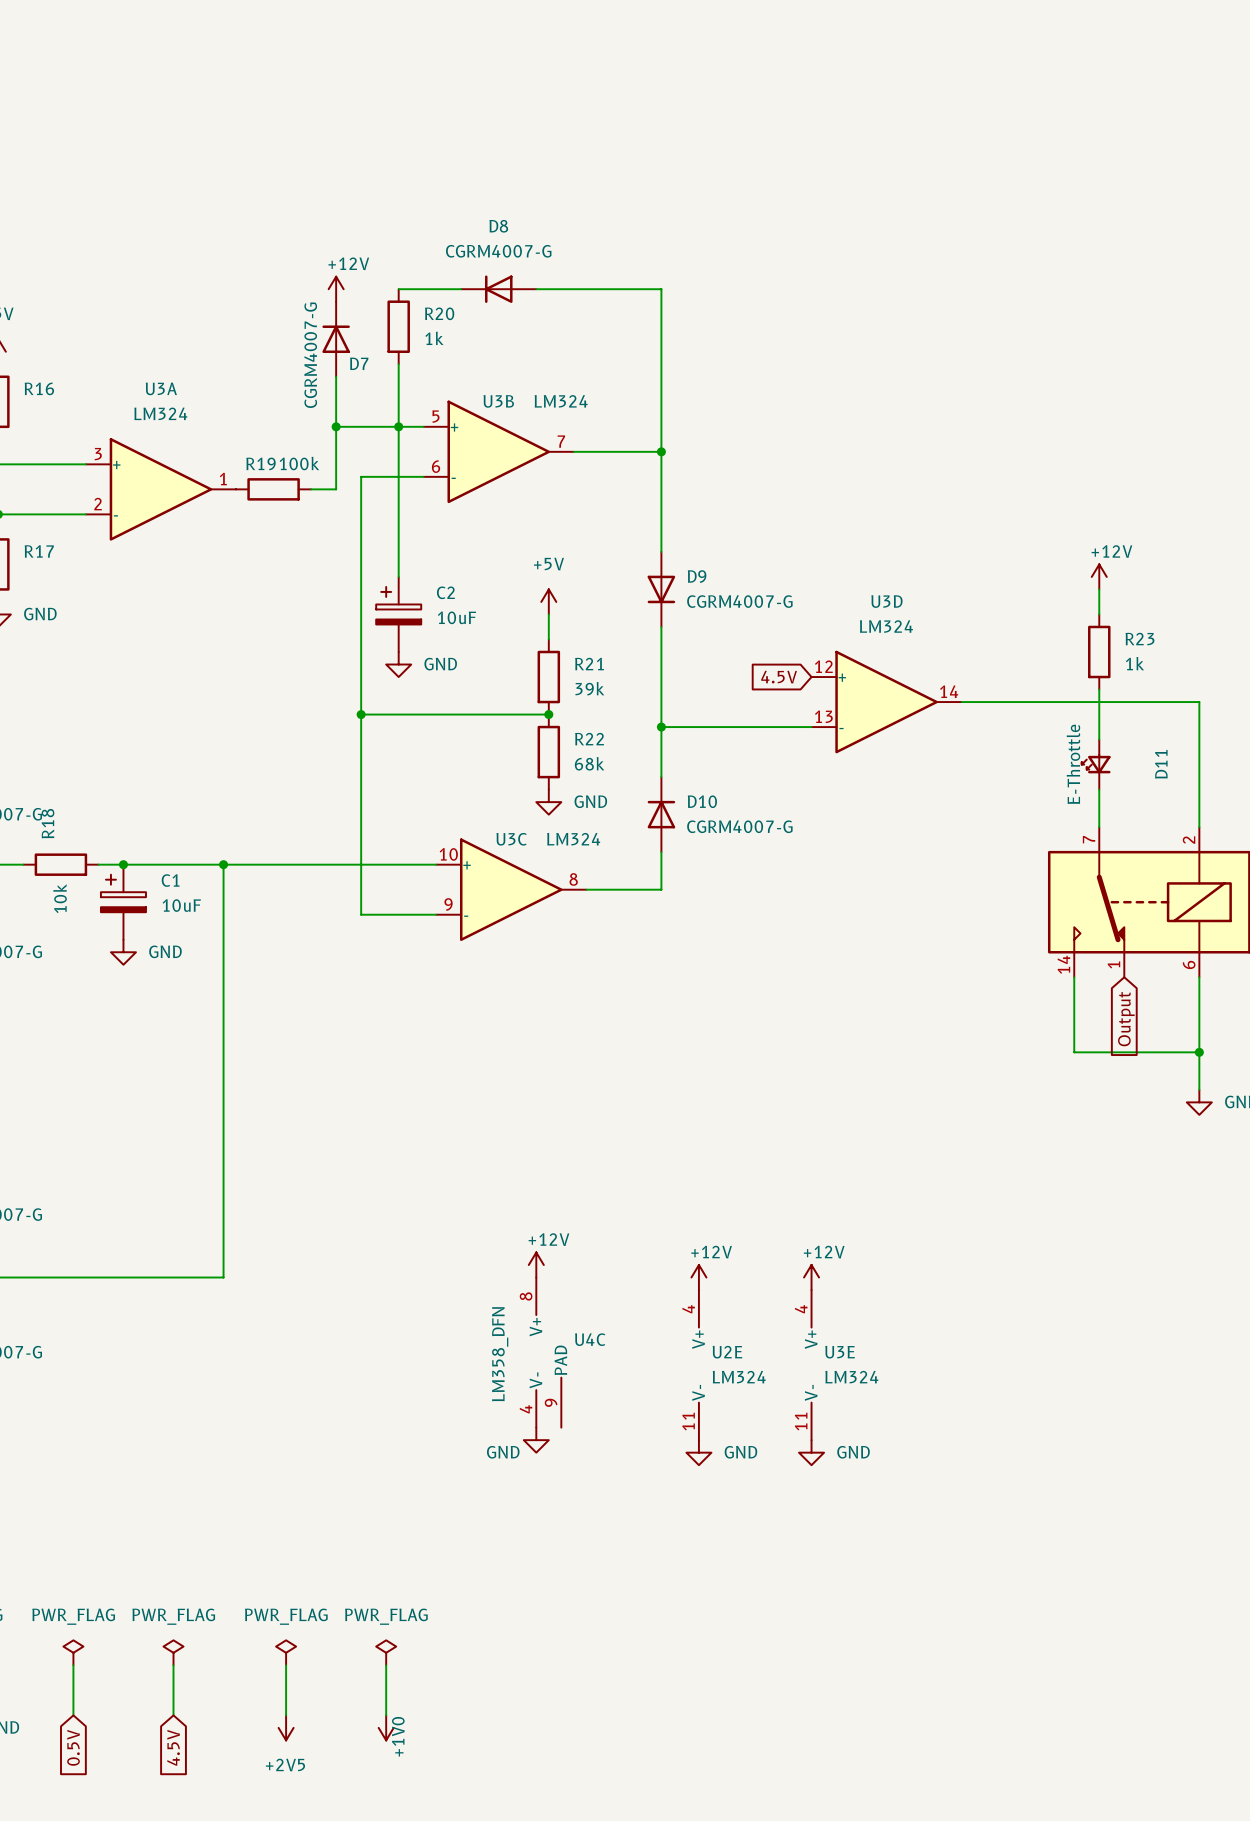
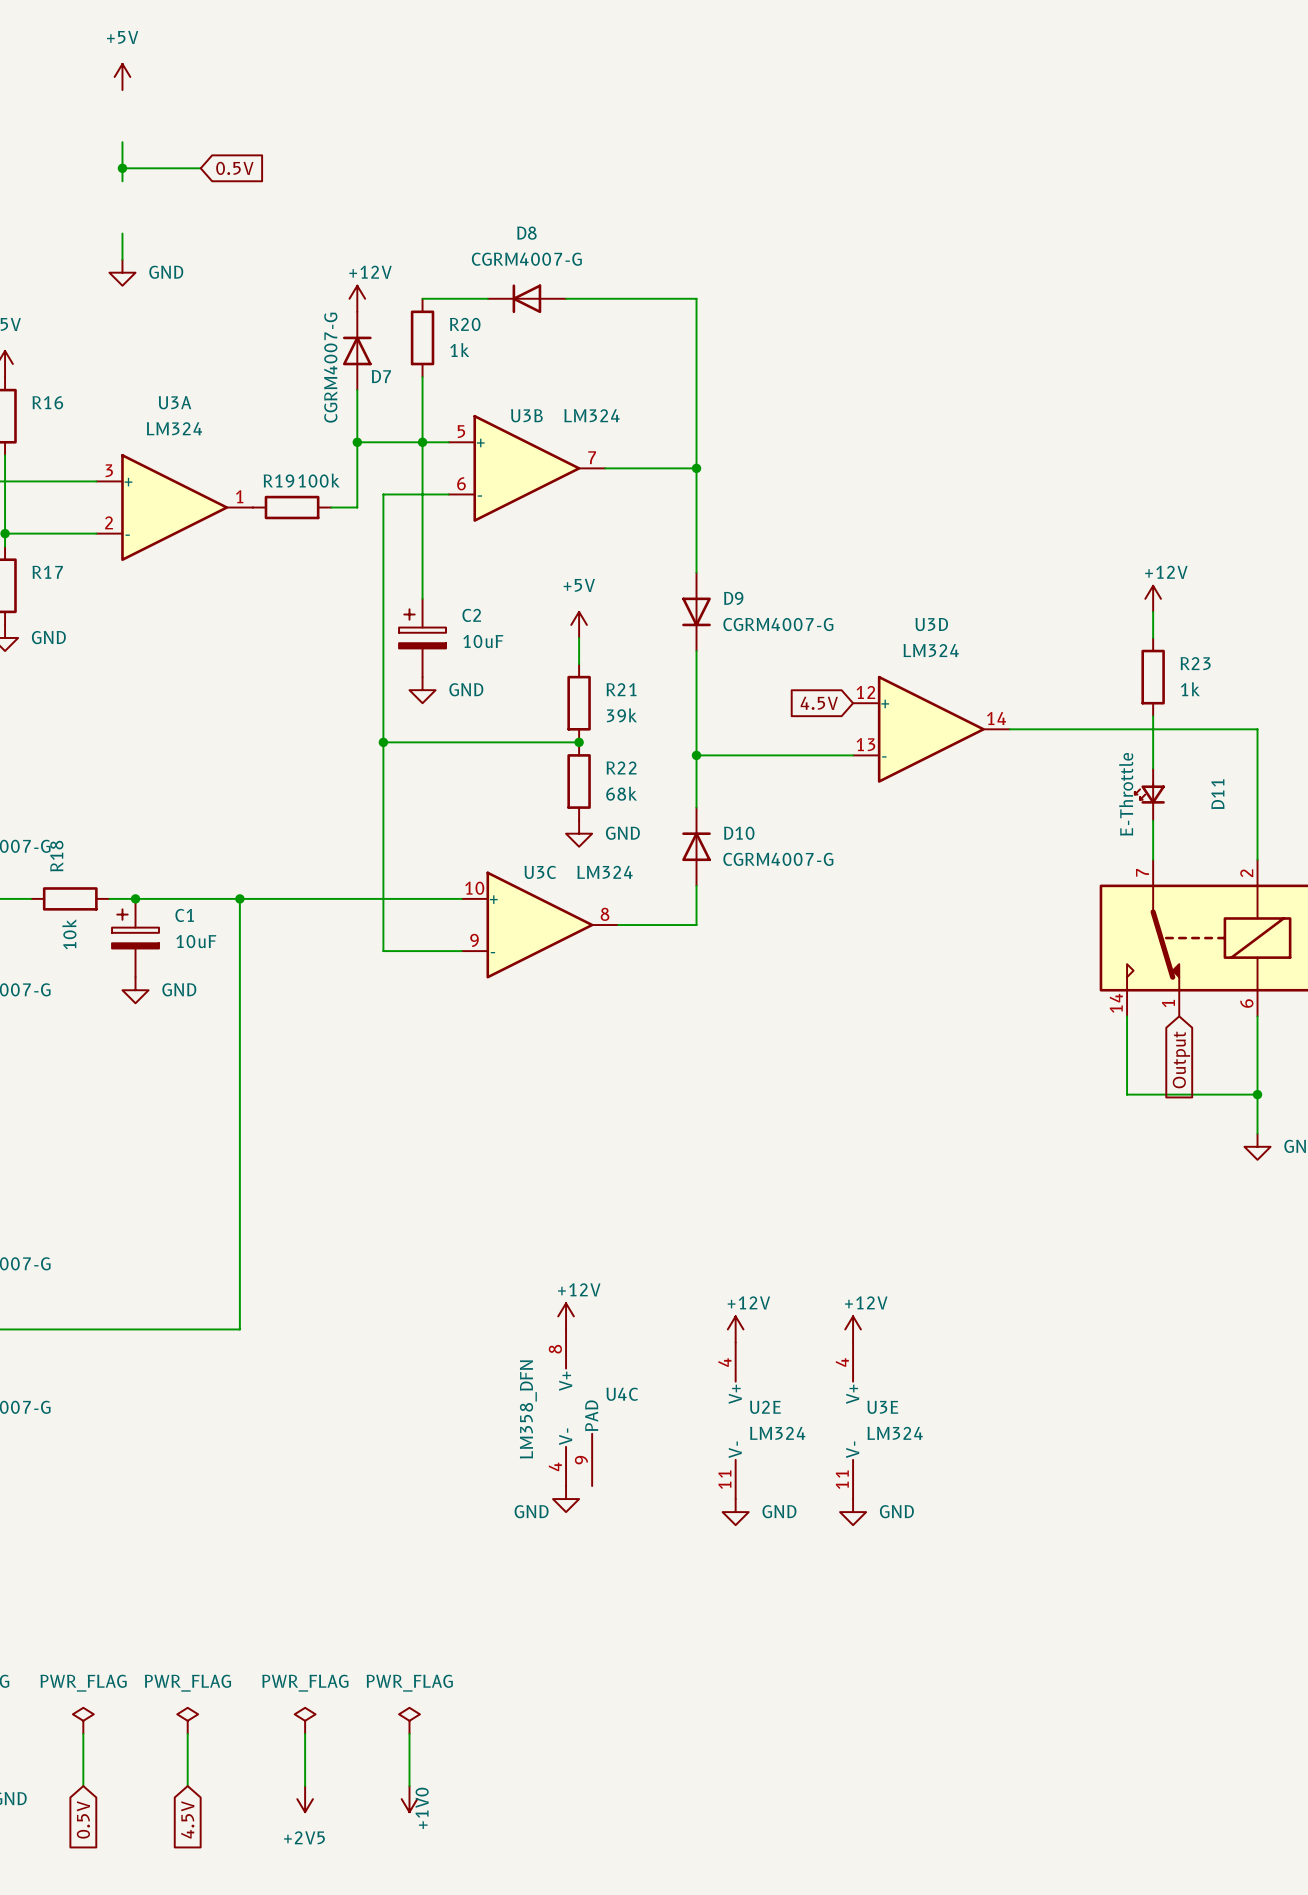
power symbol: none -> +5V (122, 76)
wire: none -> (122, 142) (122, 181)
wire: none -> (122, 168) (200, 168)
junction: none -> (122, 168)
global label: none -> 0.5V (234, 168)
wire: none -> (122, 233) (122, 259)
power symbol: none -> GND (122, 272)

